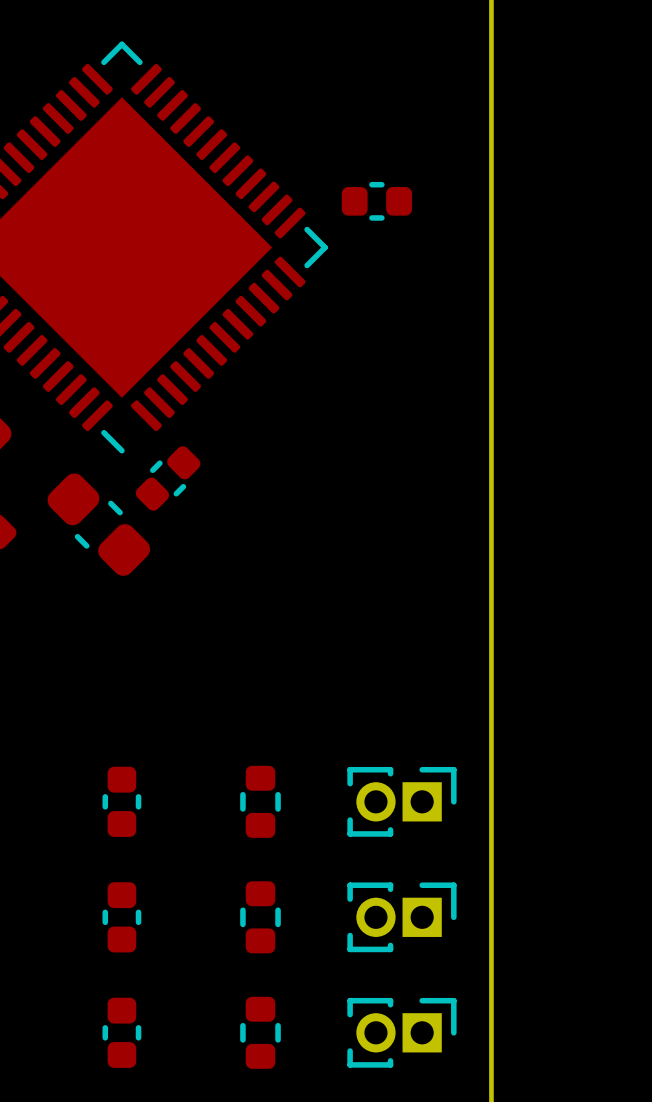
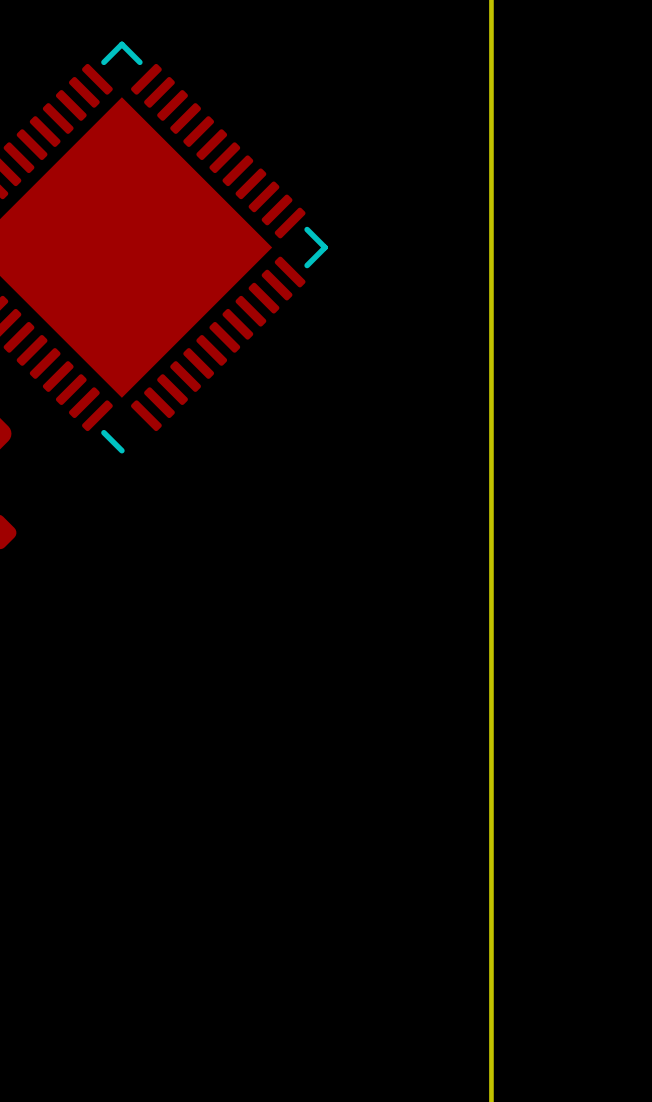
part: (376, 201) -> none
part: (168, 478) -> none
part: (98, 524) -> none
part: (121, 801) -> none
part: (260, 801) -> none
part: (401, 801) -> none
part: (121, 917) -> none
part: (260, 917) -> none
part: (401, 917) -> none
part: (121, 1032) -> none
part: (260, 1032) -> none
part: (401, 1032) -> none

